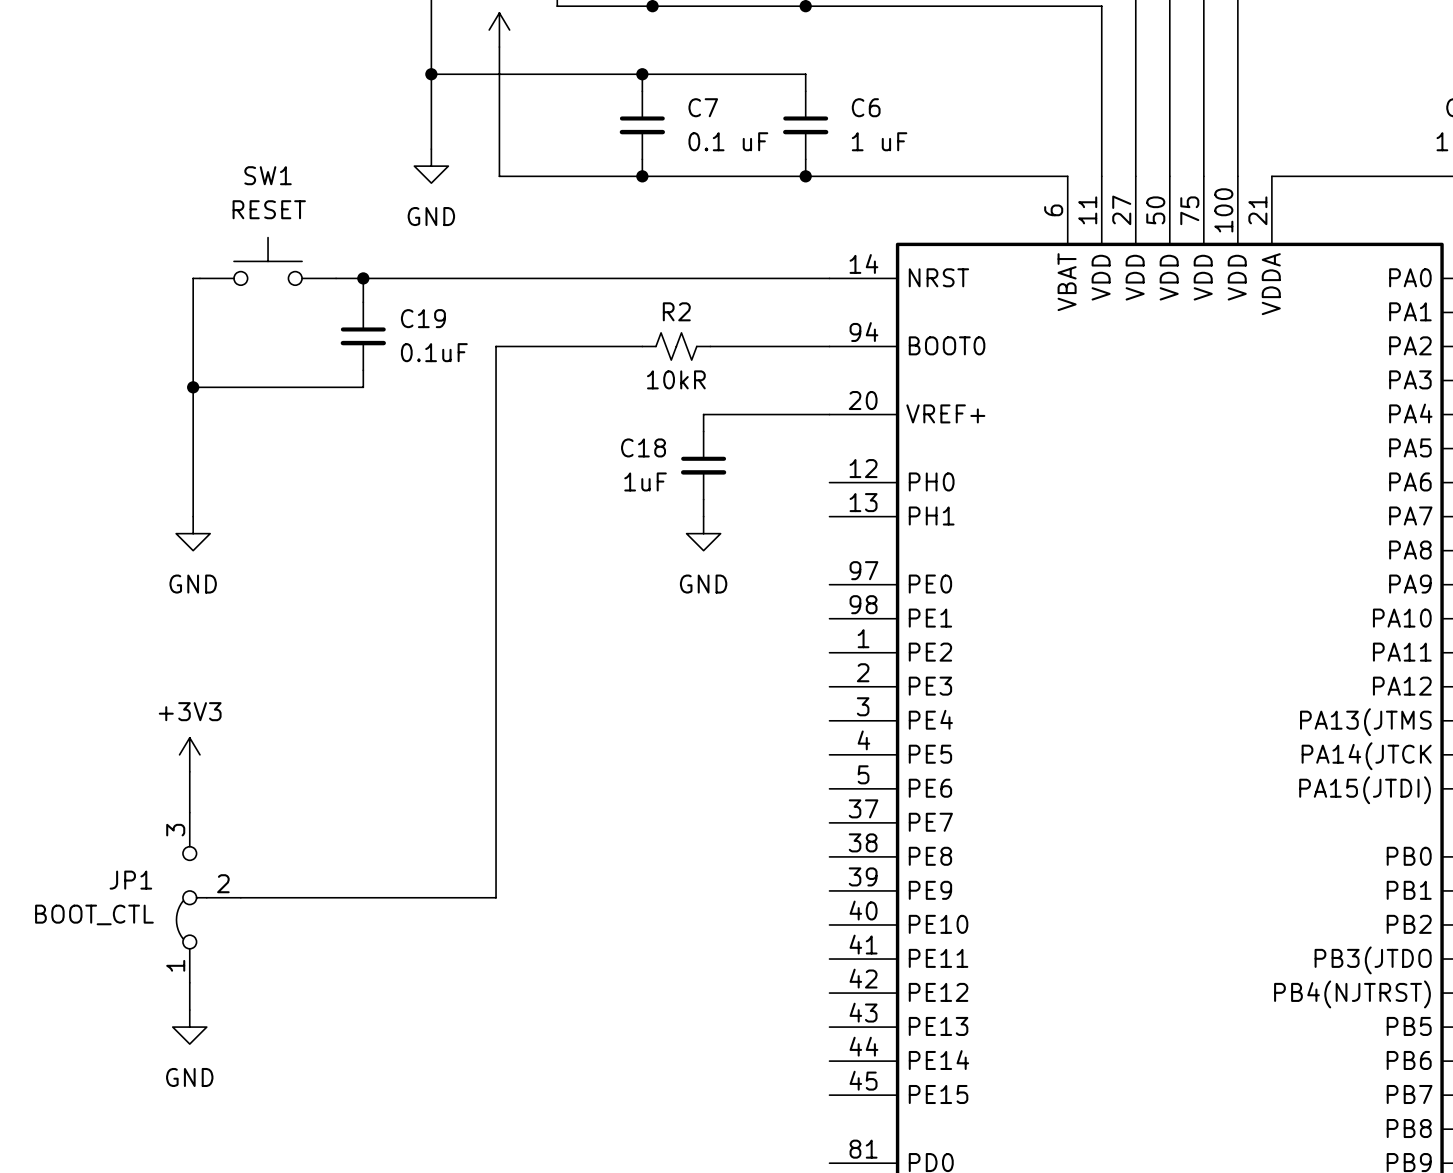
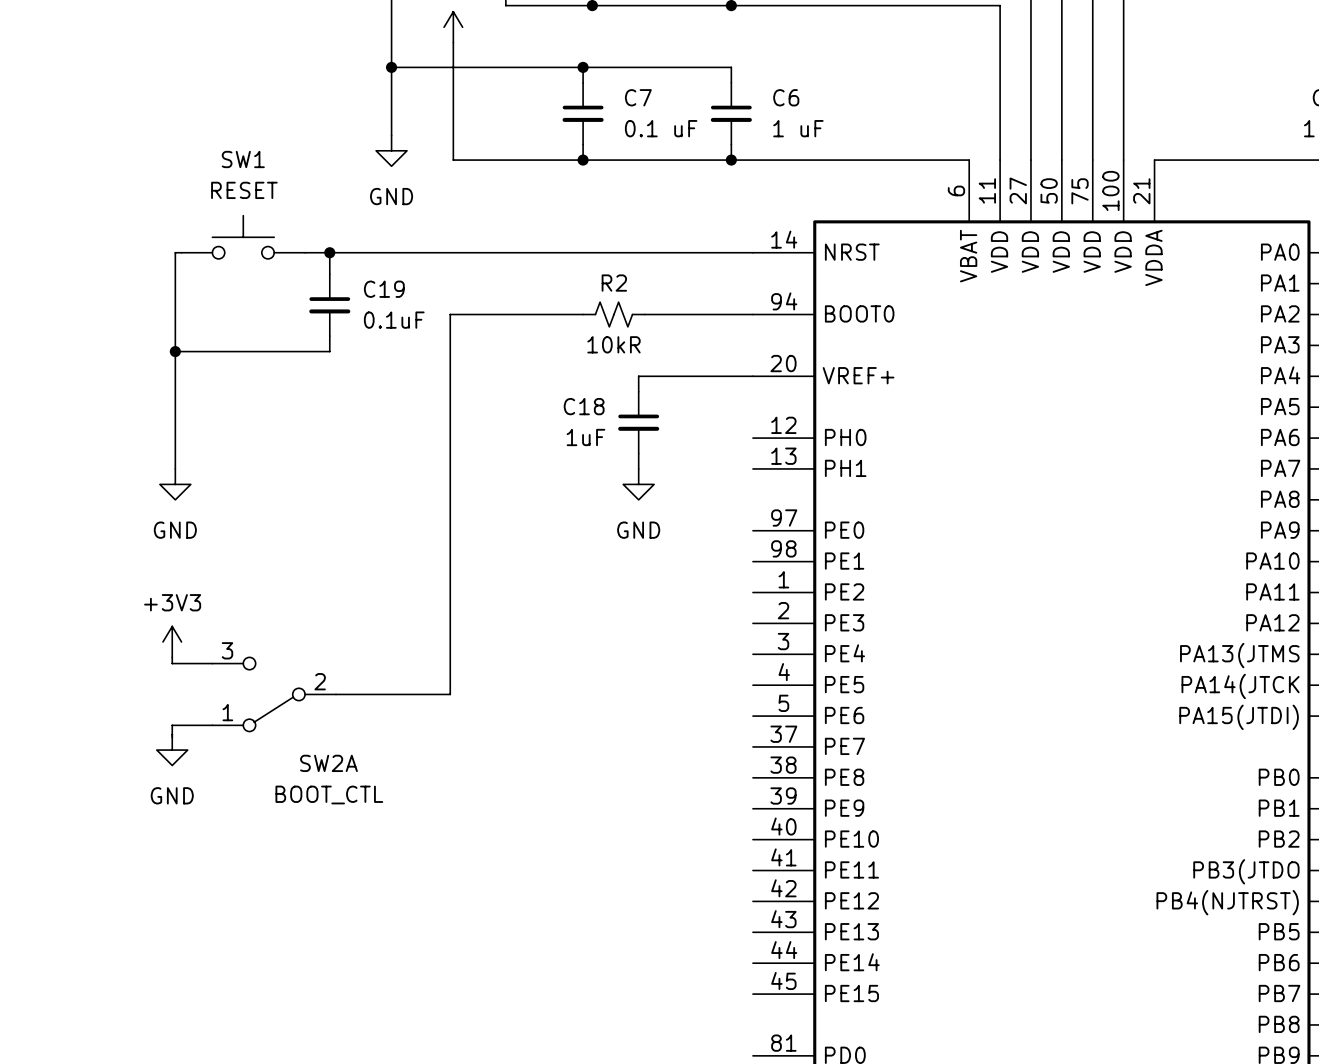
wire: none -> (172, 657) (172, 663) (212, 663)
power symbol position: +3V3 (189, 754) -> +3V3 (172, 641)
SW2A: none -> BOOT_CTL (274, 694)
wire: (496, 765) (496, 897) (240, 897) -> (450, 694) (335, 694)
wire: (189, 771) (189, 799) -> (212, 725) (172, 725)
JP1: BOOT_CTL (208, 897) -> none
wire: (189, 982) (189, 1010) -> none
power symbol position: GND (189, 1027) -> GND (172, 750)

